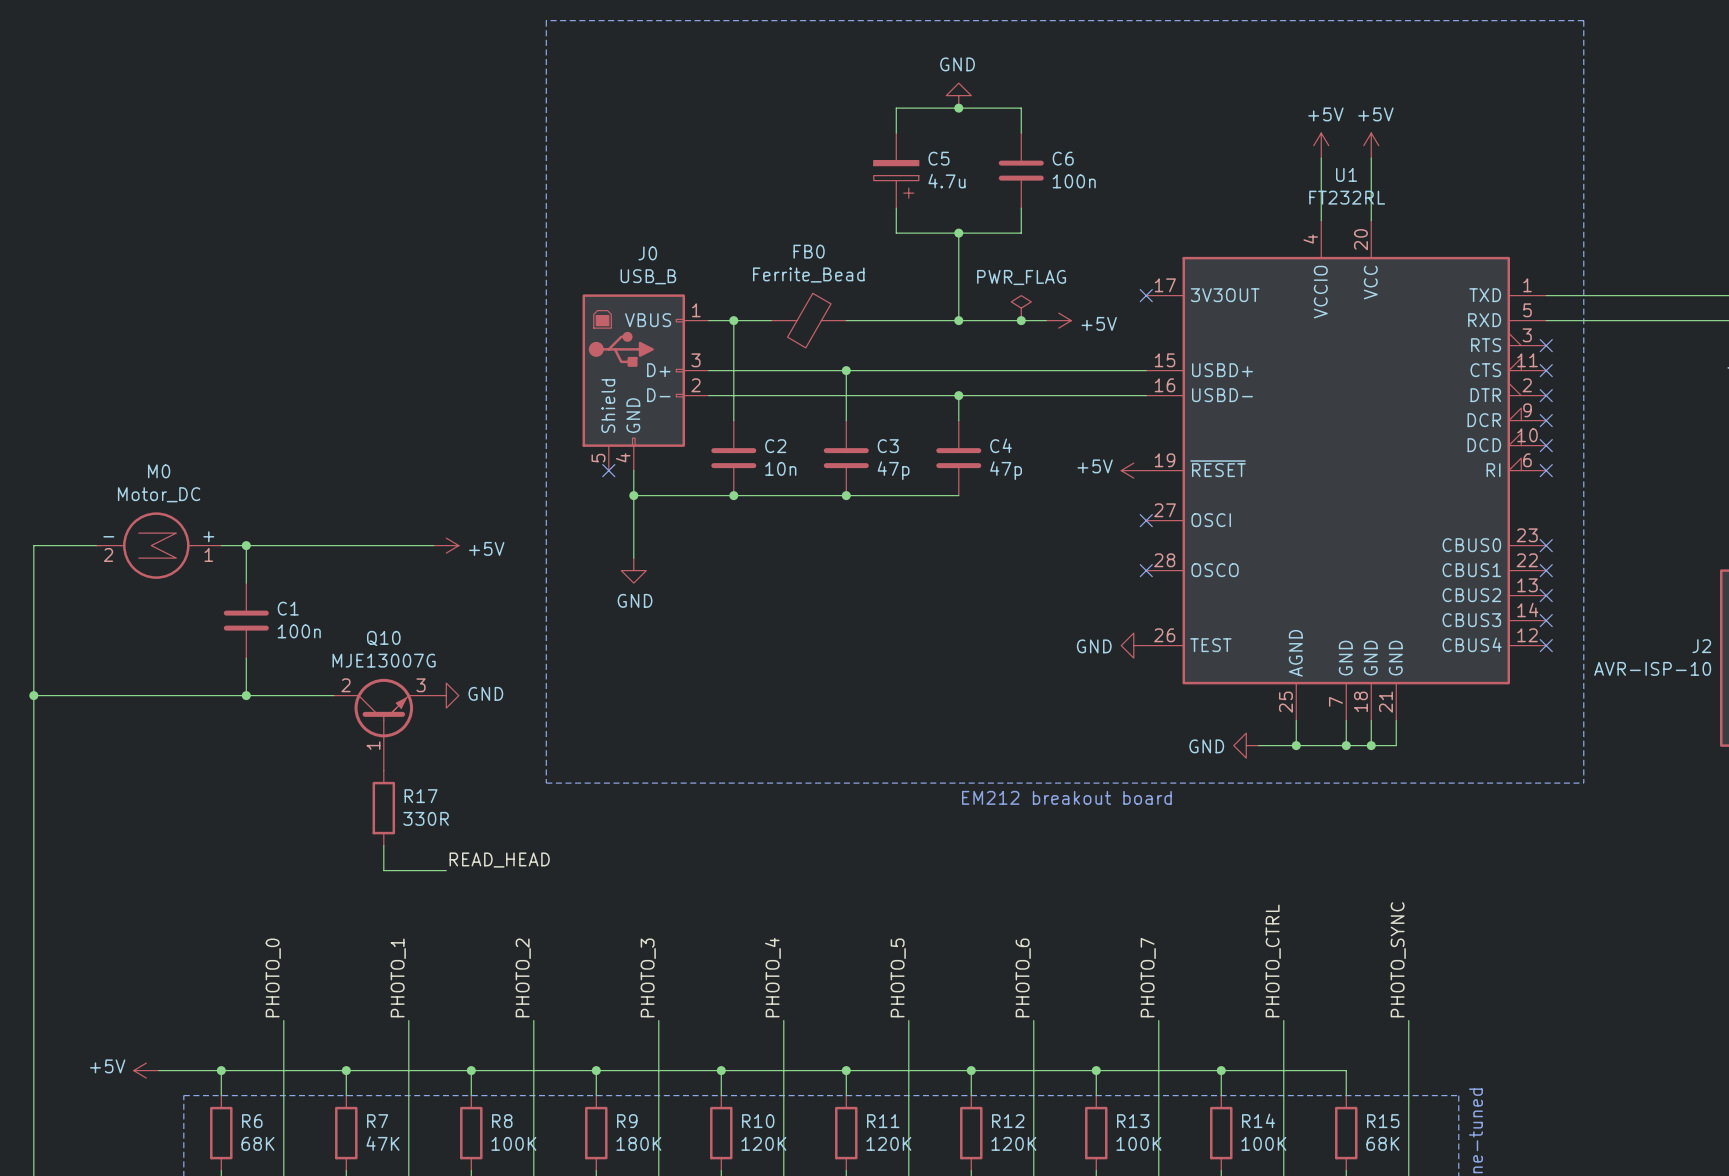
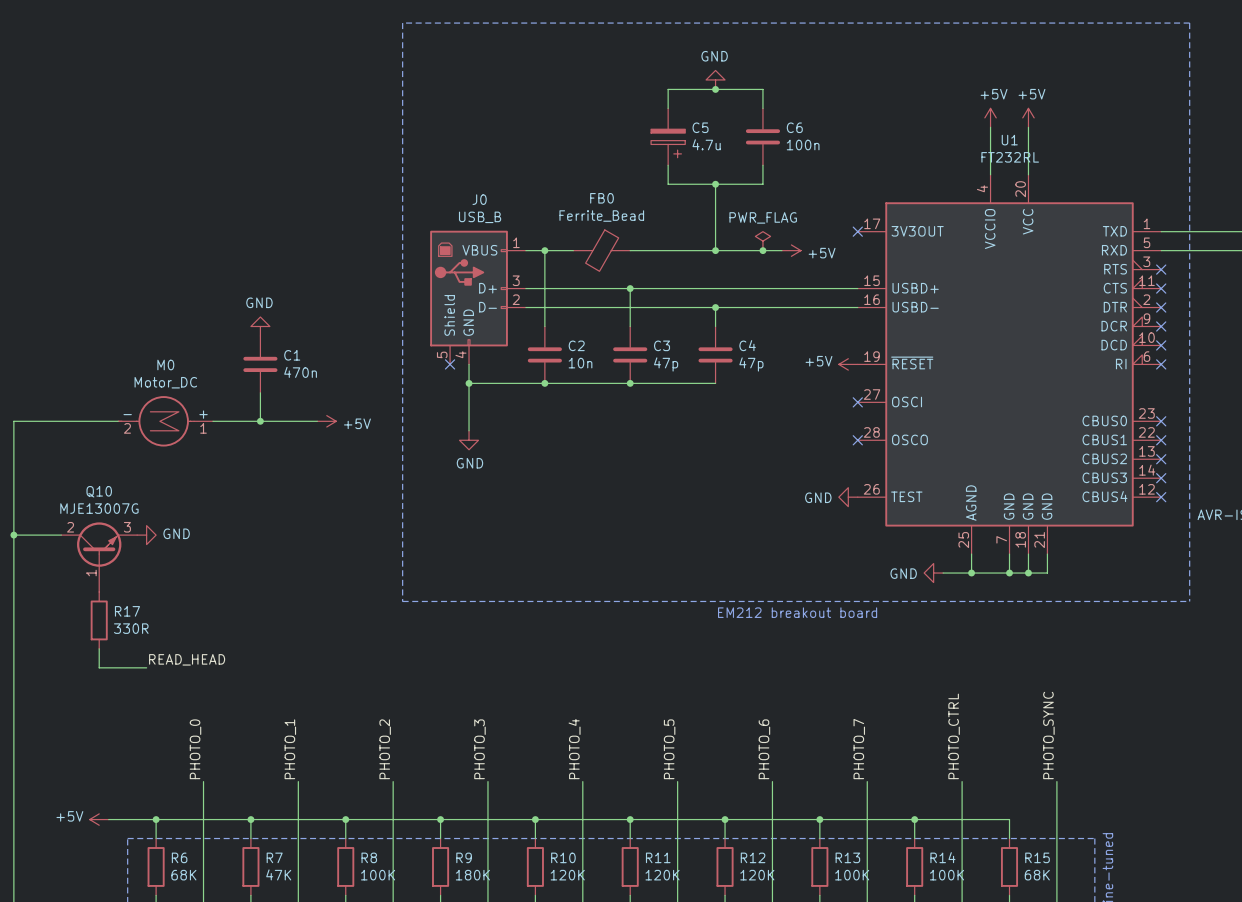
power symbol: none -> GND (260, 326)
M0 position: (158, 545) -> (165, 421)
wire: (221, 545) (296, 545) -> (61, 421) (118, 421)
wire: (246, 545) (246, 583) -> (260, 392) (260, 421)
junction: (246, 545) -> none
junction: none -> (260, 421)
C1 position: (246, 620) -> (260, 364)
C1 value: 100n (299, 631) -> 470n (300, 372)
wire: (246, 658) (246, 695) -> none
wire: (96, 695) (333, 695) -> none
power symbol: none -> GND (146, 535)
junction: (246, 695) -> none
power symbol: GND (446, 695) -> none
Q10 position: (383, 724) -> (99, 557)
R17 position: (383, 808) -> (99, 620)
wire: (383, 845) (383, 870) (446, 870) -> (99, 648) (99, 667) (146, 667)
label position: READ_HEAD (499, 860) -> READ_HEAD (187, 659)

